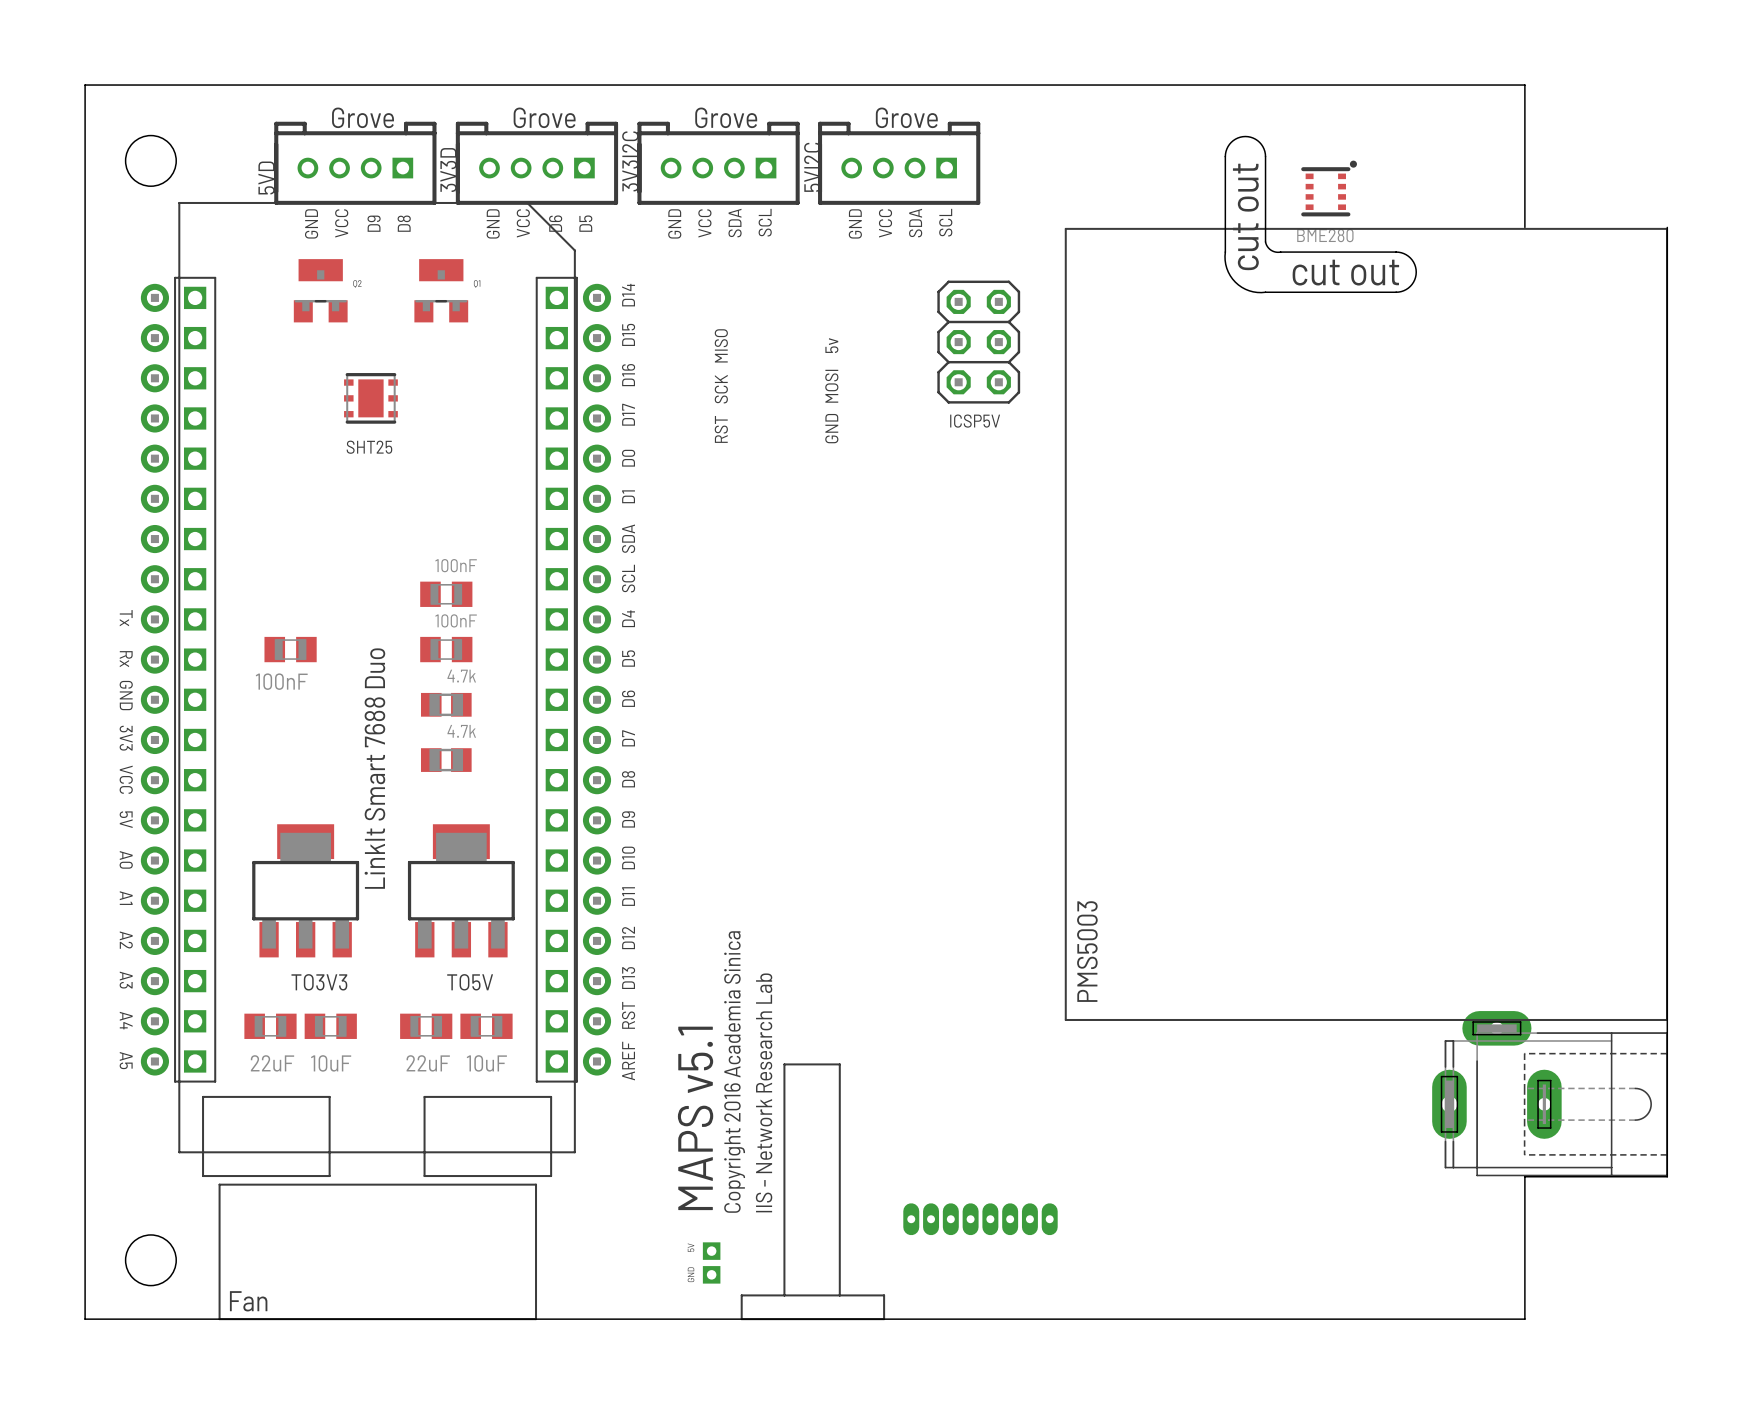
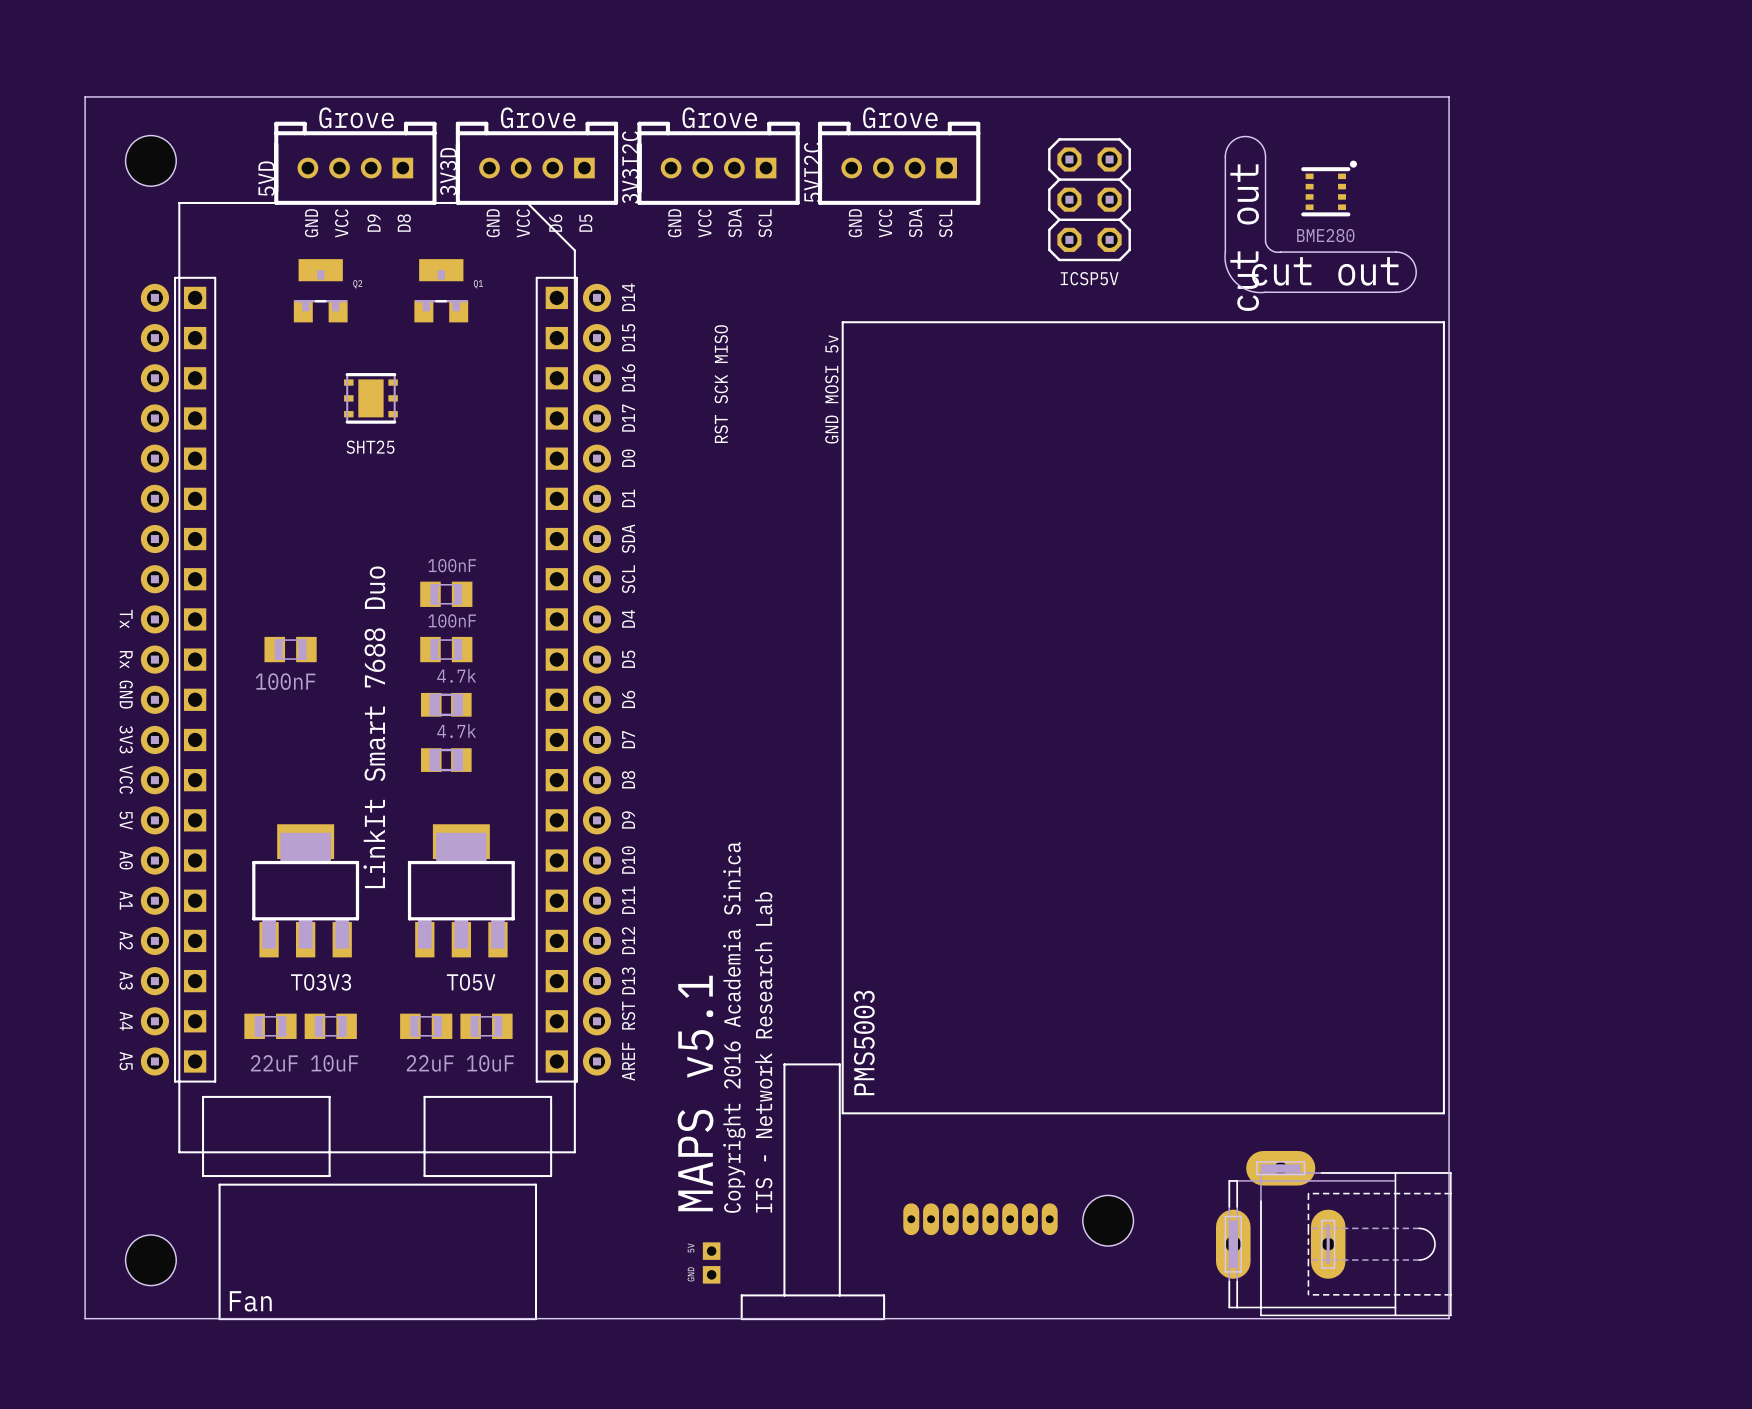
board edge: (85, 96) (85, 85) (1524, 85) (1524, 227) -> none
board edge: (1667, 227) (1667, 1176) (1524, 1176) (1524, 1319) (85, 1318) -> (85, 96) (1449, 96) (1449, 1318) (85, 1318)
ICSP5V position: (978, 342) -> (1089, 199)
drawing position: (1366, 624) -> (1143, 717)
part position: (1549, 1093) -> (1333, 1233)
hole: none -> (1108, 1220)

